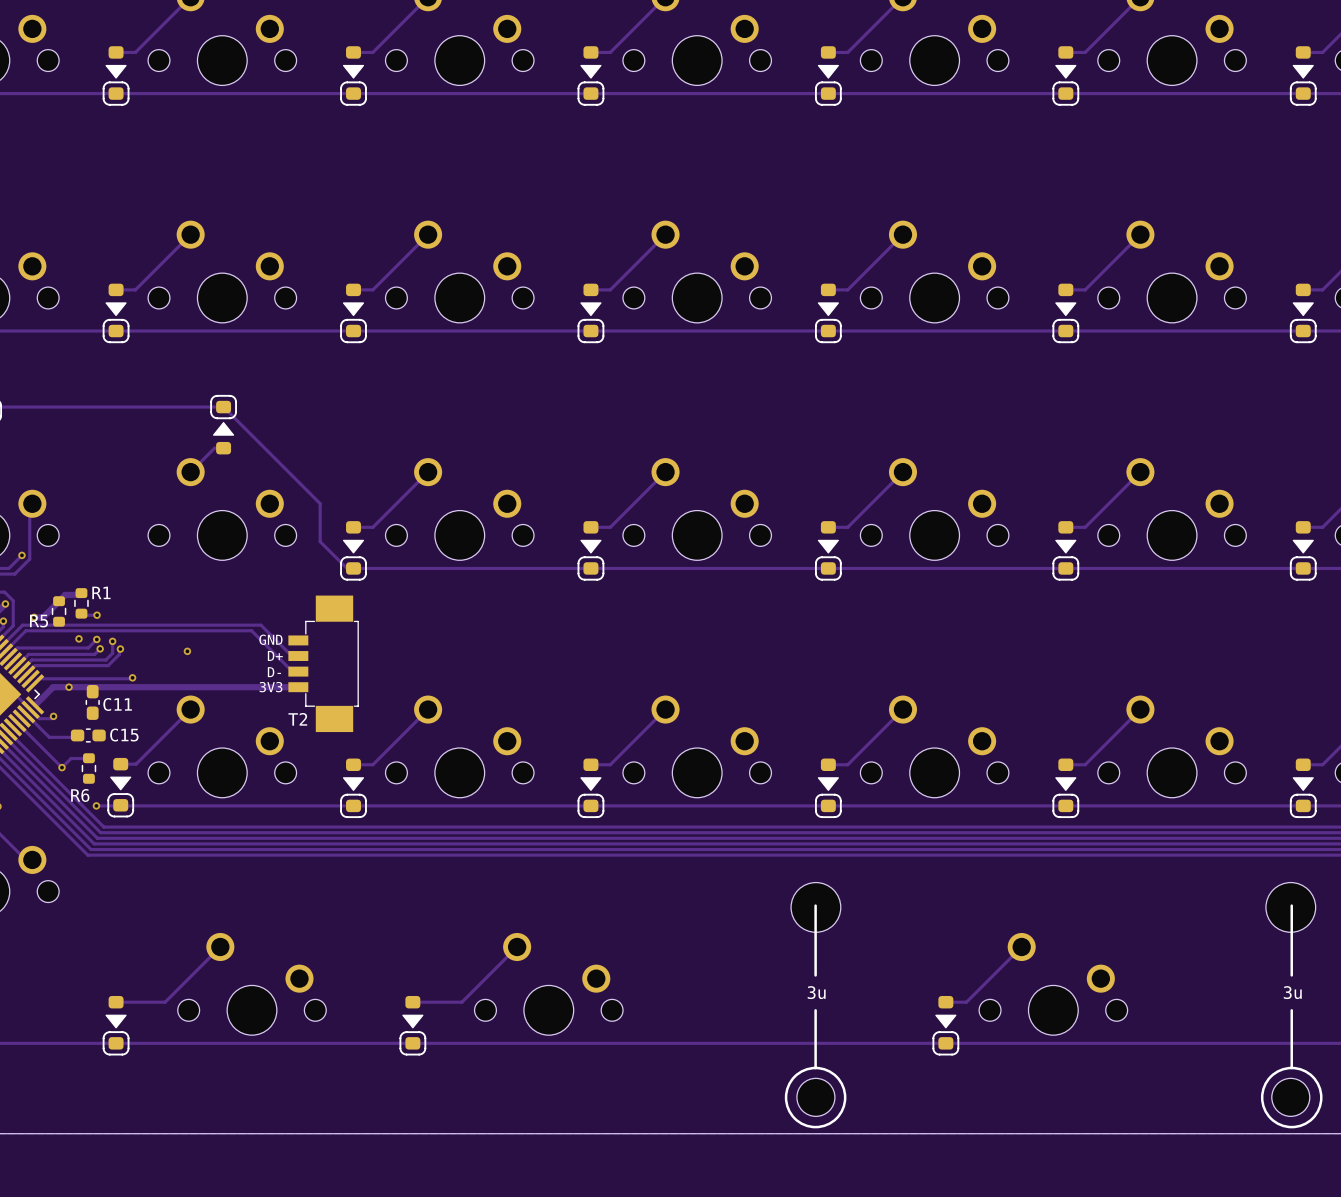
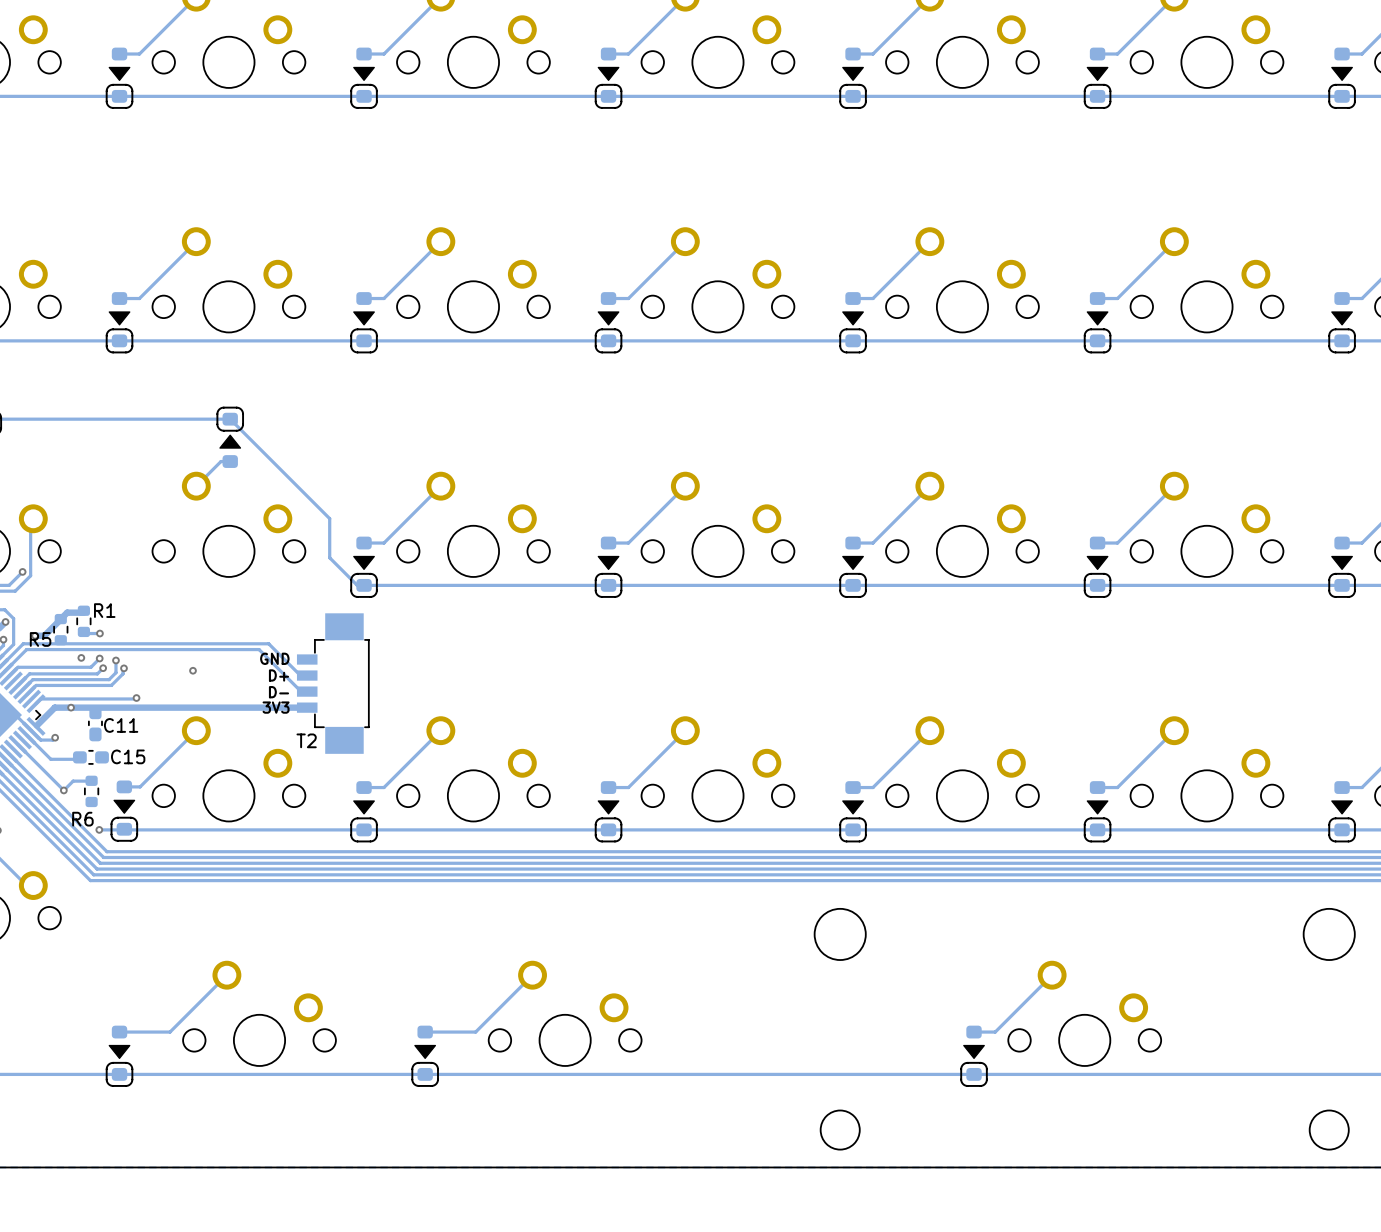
line: (815, 905) (815, 975) -> none
line: (1291, 905) (1291, 975) -> none
text: 3u (816, 992) -> none
text: 3u (1292, 992) -> none
line: (815, 1010) (815, 1068) -> none
line: (1291, 1010) (1291, 1068) -> none
drawing: [784, 1066, 847, 1129] -> none
drawing: [1260, 1066, 1323, 1129] -> none

